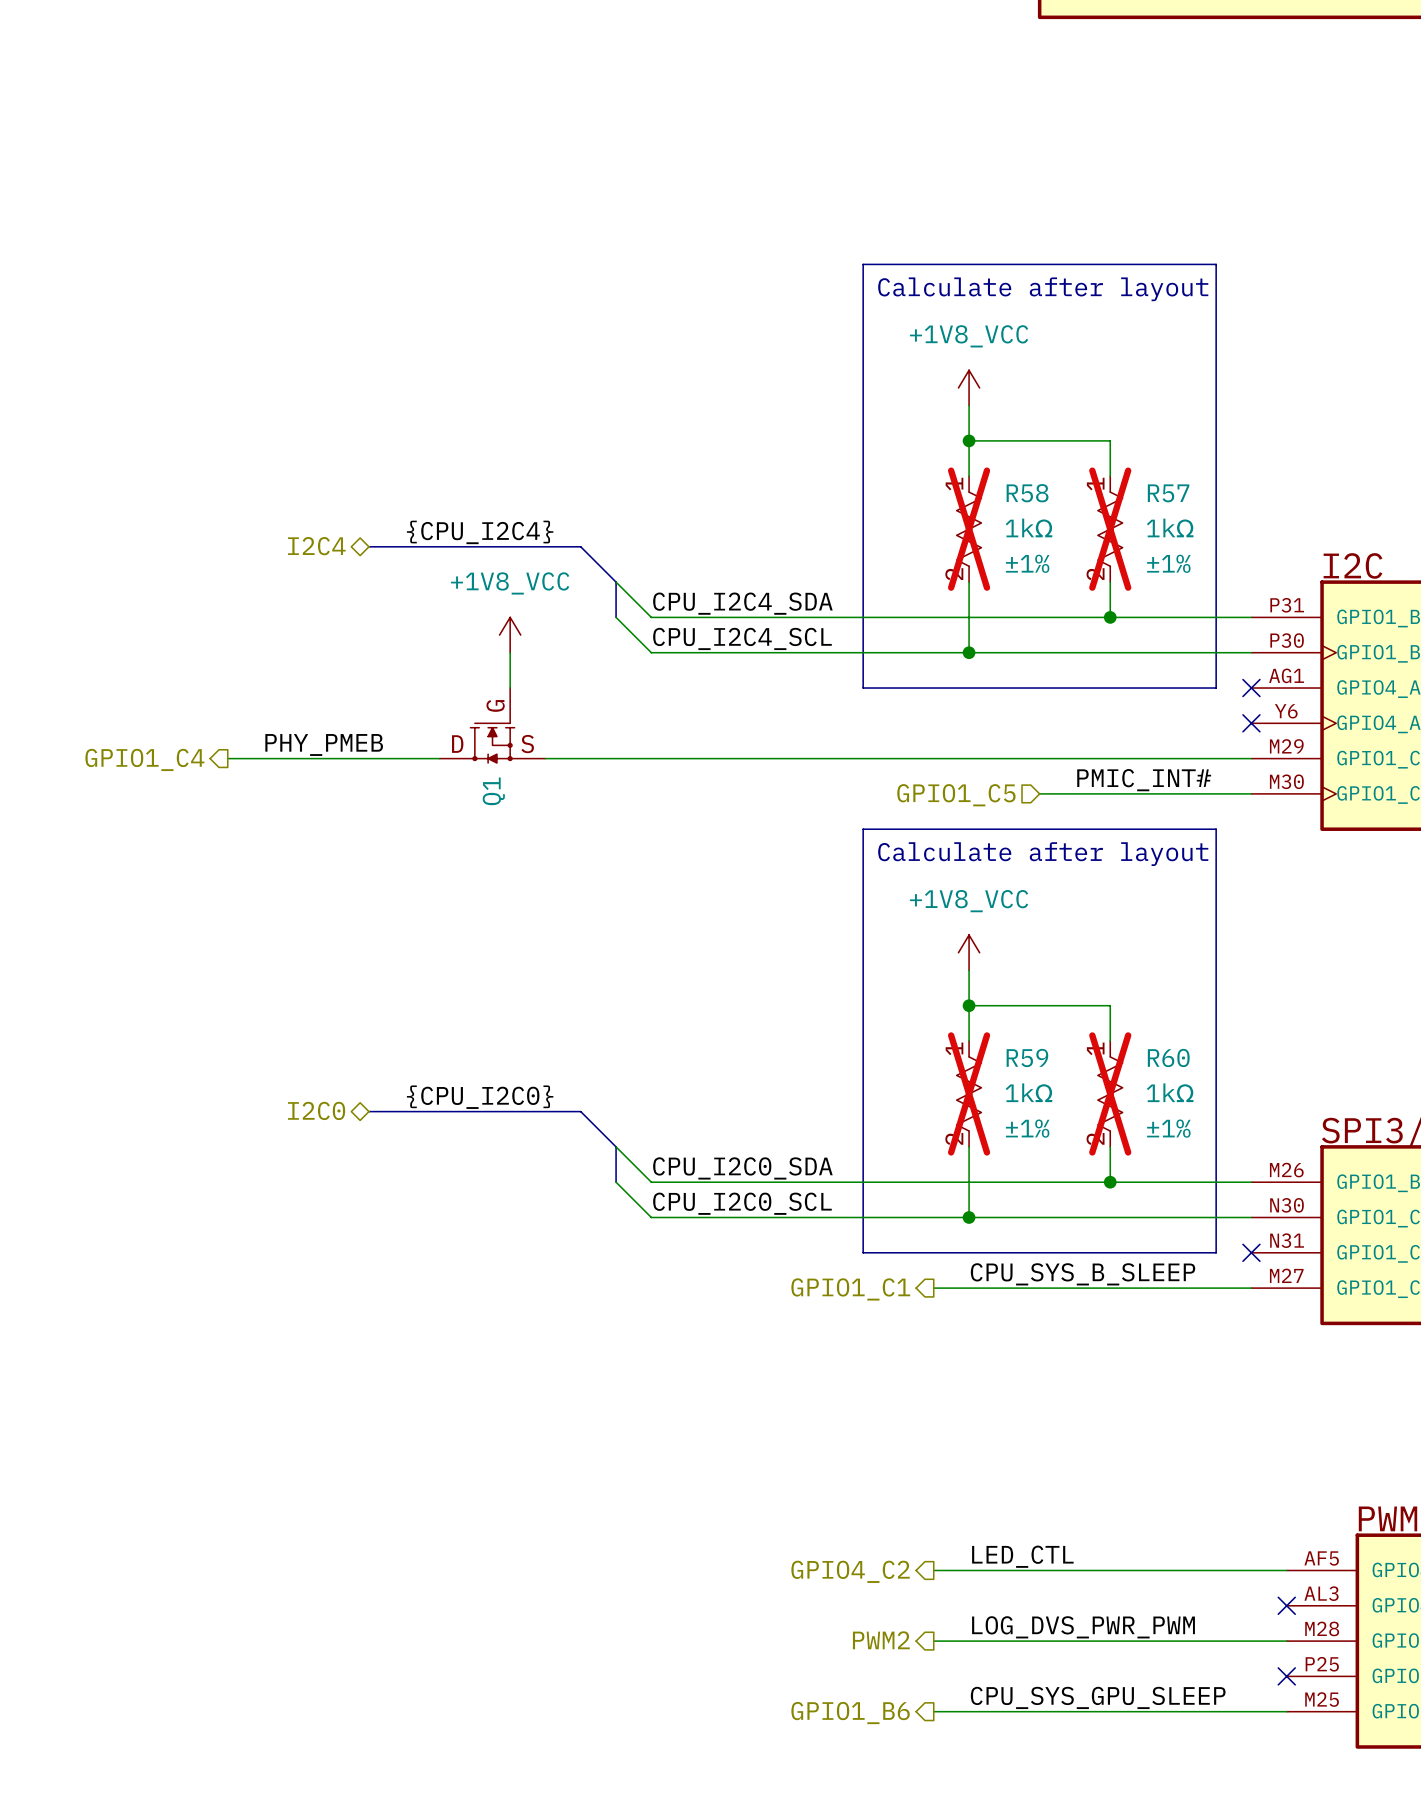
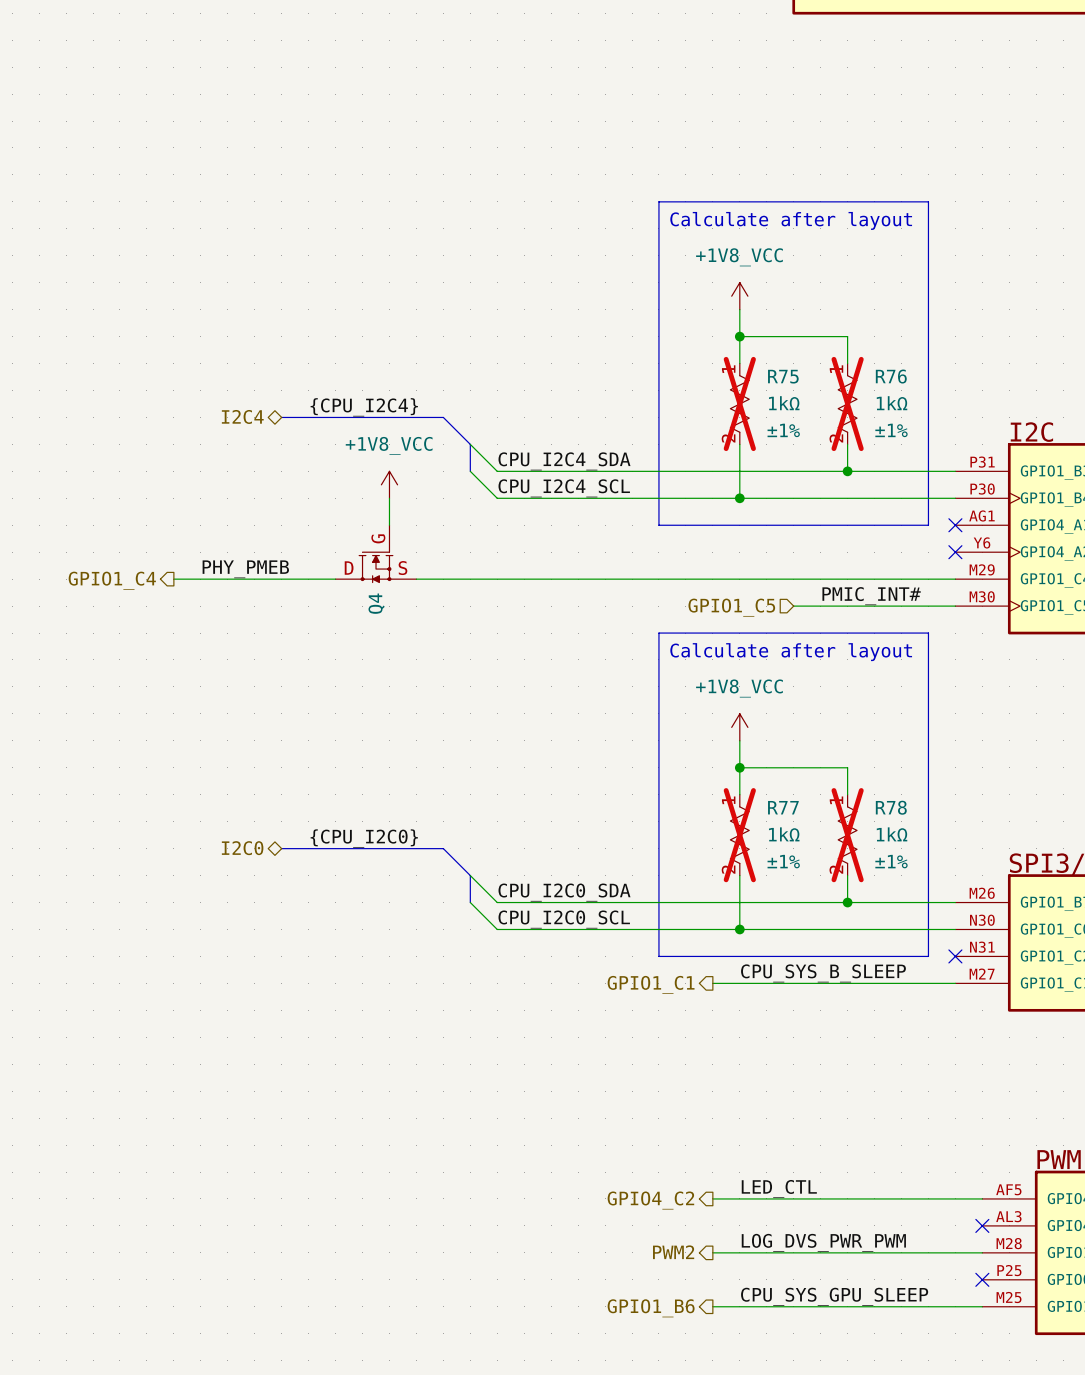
R58 name: R58 (1027, 493) -> R75 (783, 376)
R57 name: R57 (1168, 493) -> R76 (891, 376)
Q1 name: Q1 (493, 791) -> Q4 (376, 603)
R59 name: R59 (1027, 1057) -> R77 (783, 807)
R60 name: R60 (1168, 1057) -> R78 (891, 807)

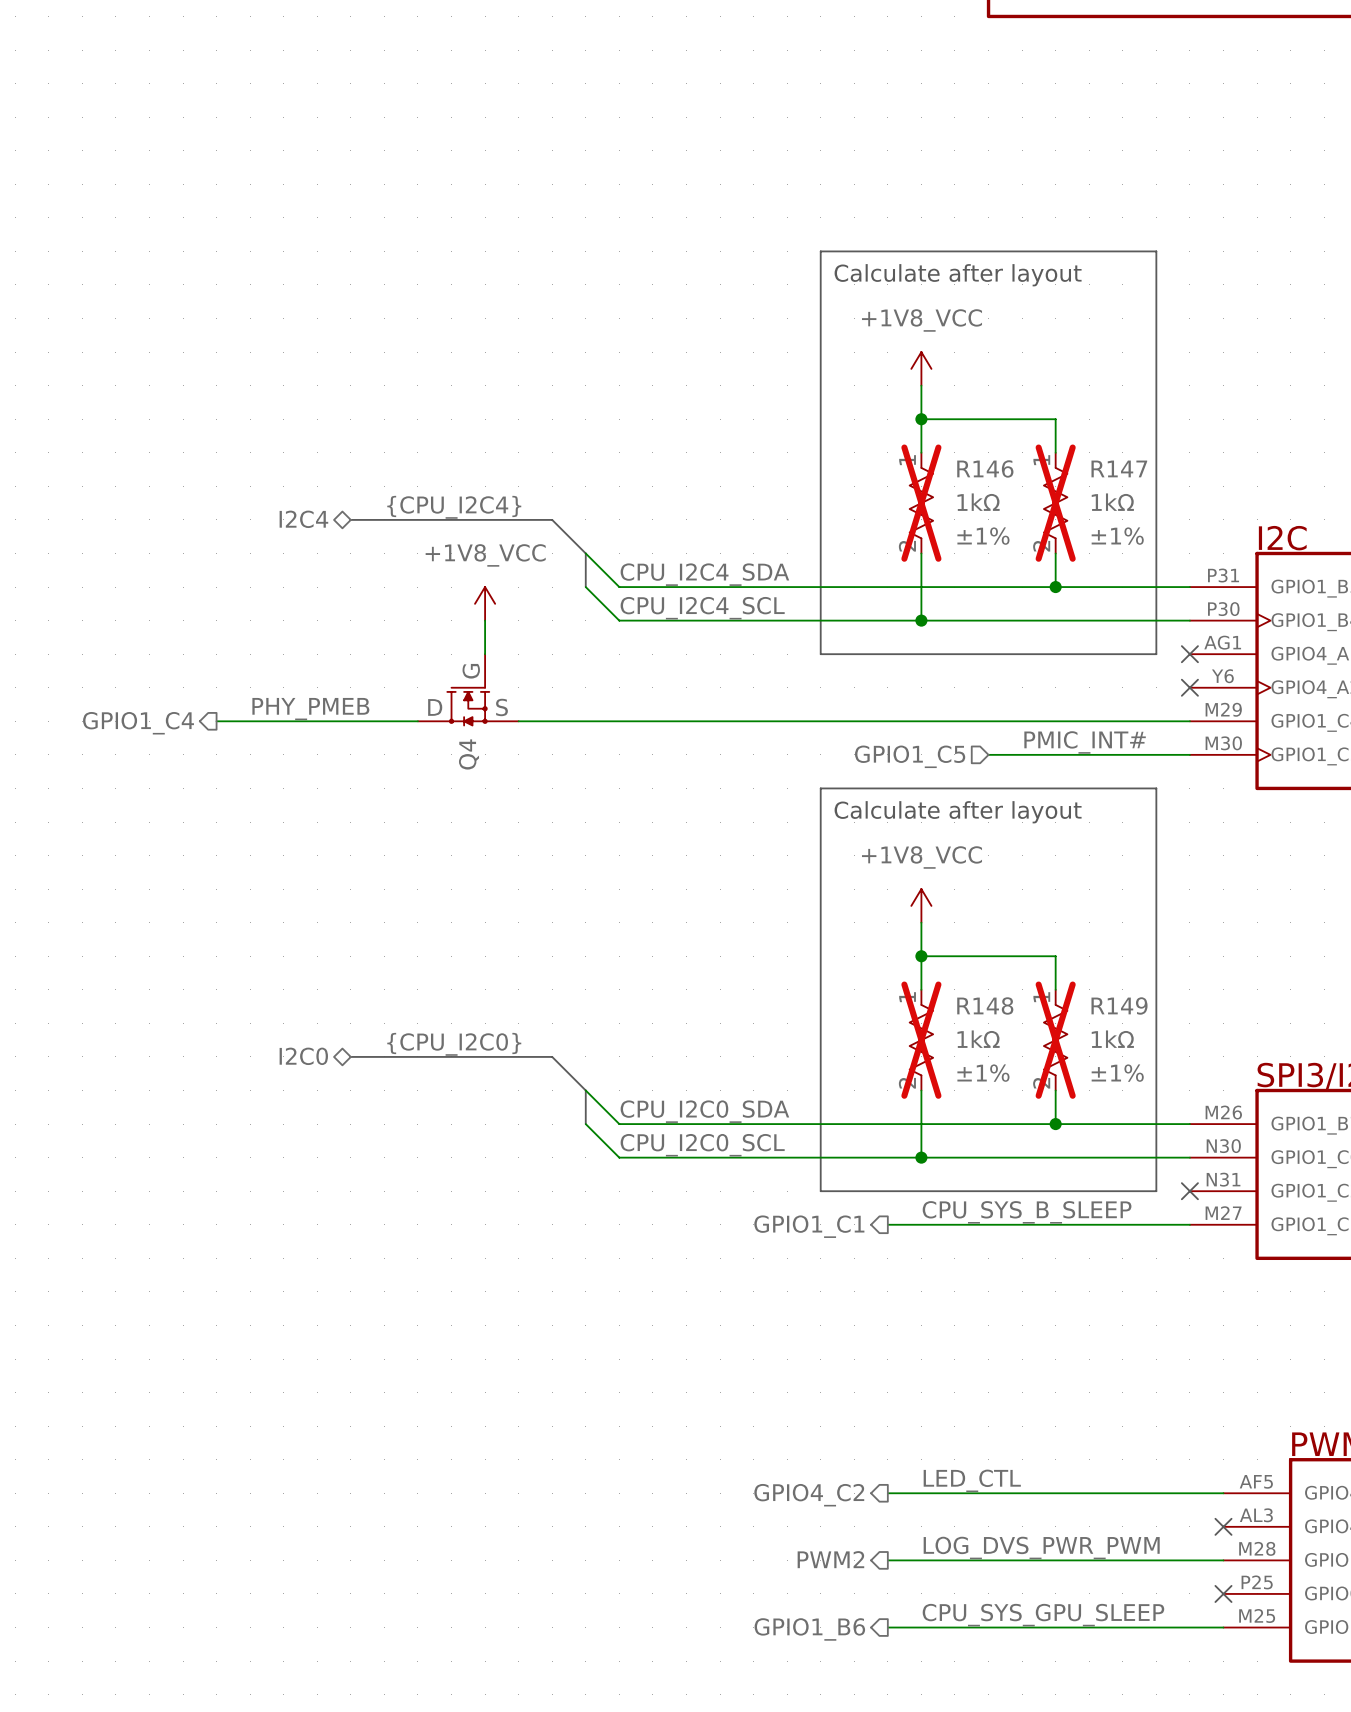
R75 name: R75 (783, 376) -> R146 (985, 468)
R76 name: R76 (891, 376) -> R147 (1119, 468)
R77 name: R77 (783, 807) -> R148 (985, 1005)
R78 name: R78 (891, 807) -> R149 (1119, 1005)

